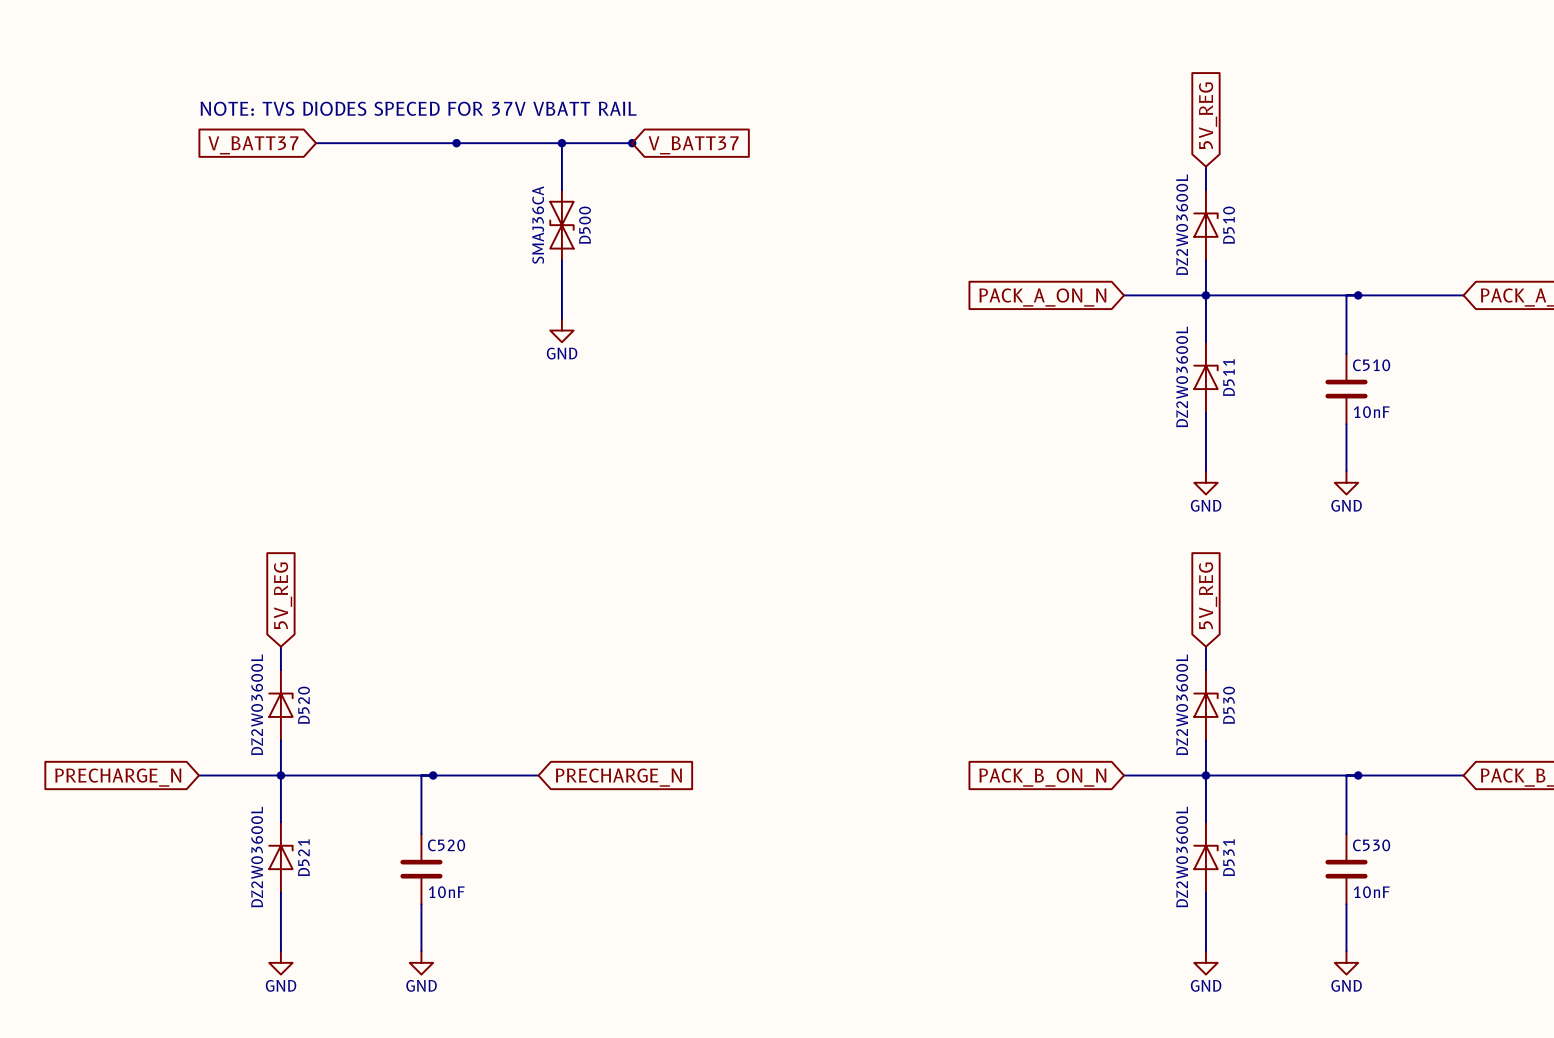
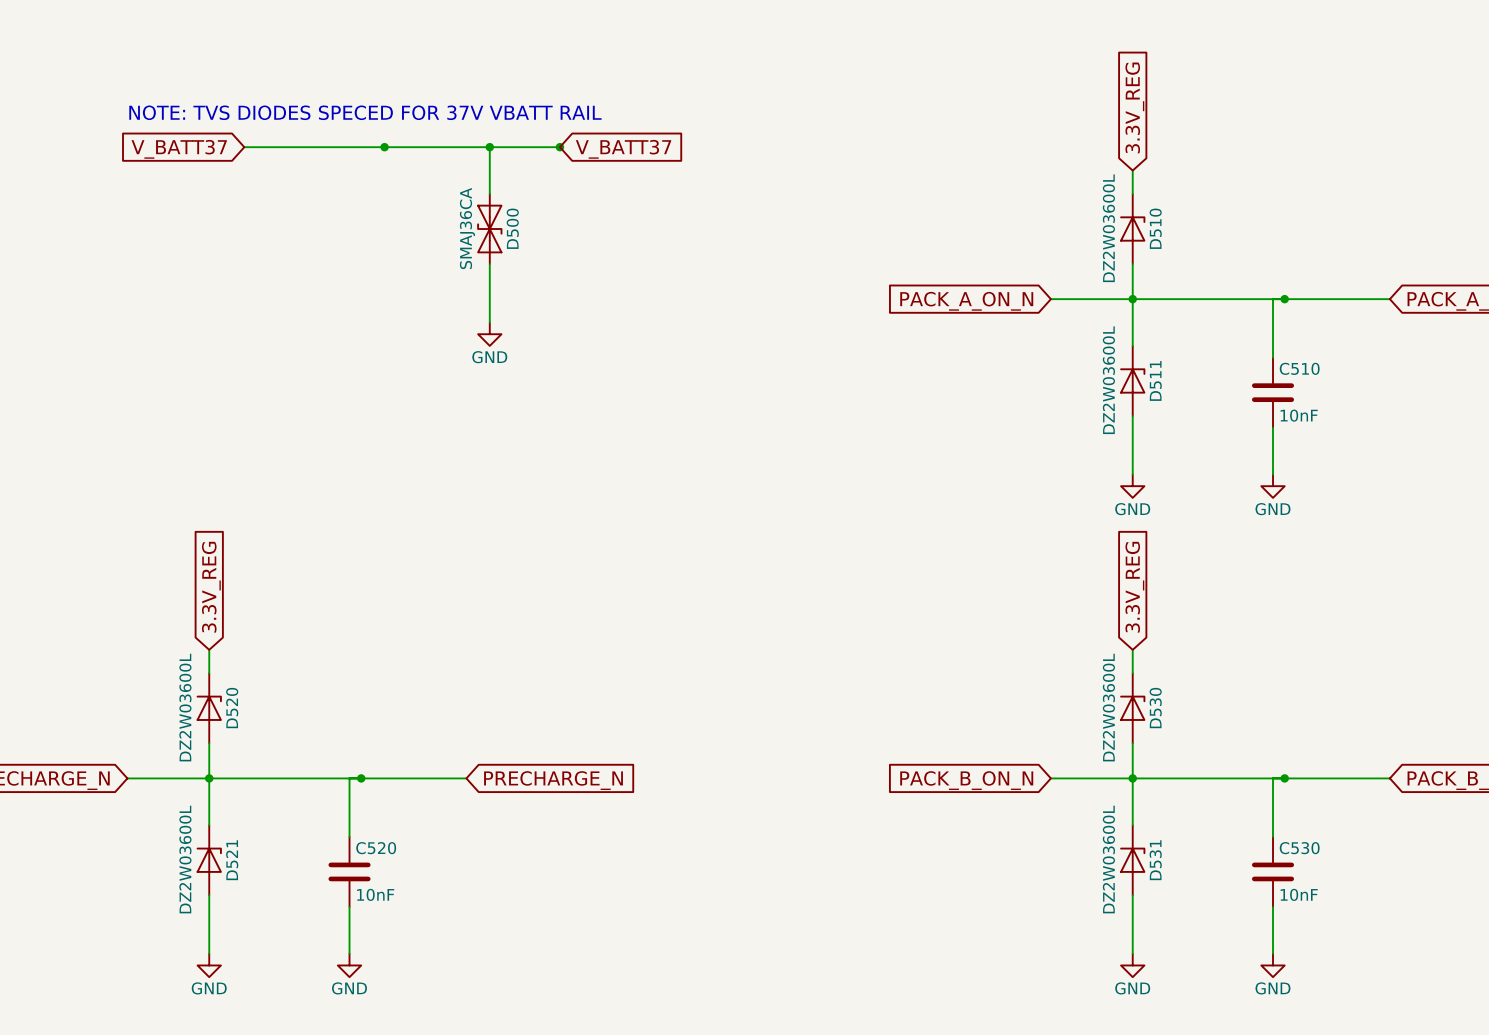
global label: 5V_REG (1208, 115) -> 3.3V_REG (1134, 107)
global label: 5V_REG (283, 595) -> 3.3V_REG (211, 587)
global label: 5V_REG (1208, 595) -> 3.3V_REG (1134, 587)

